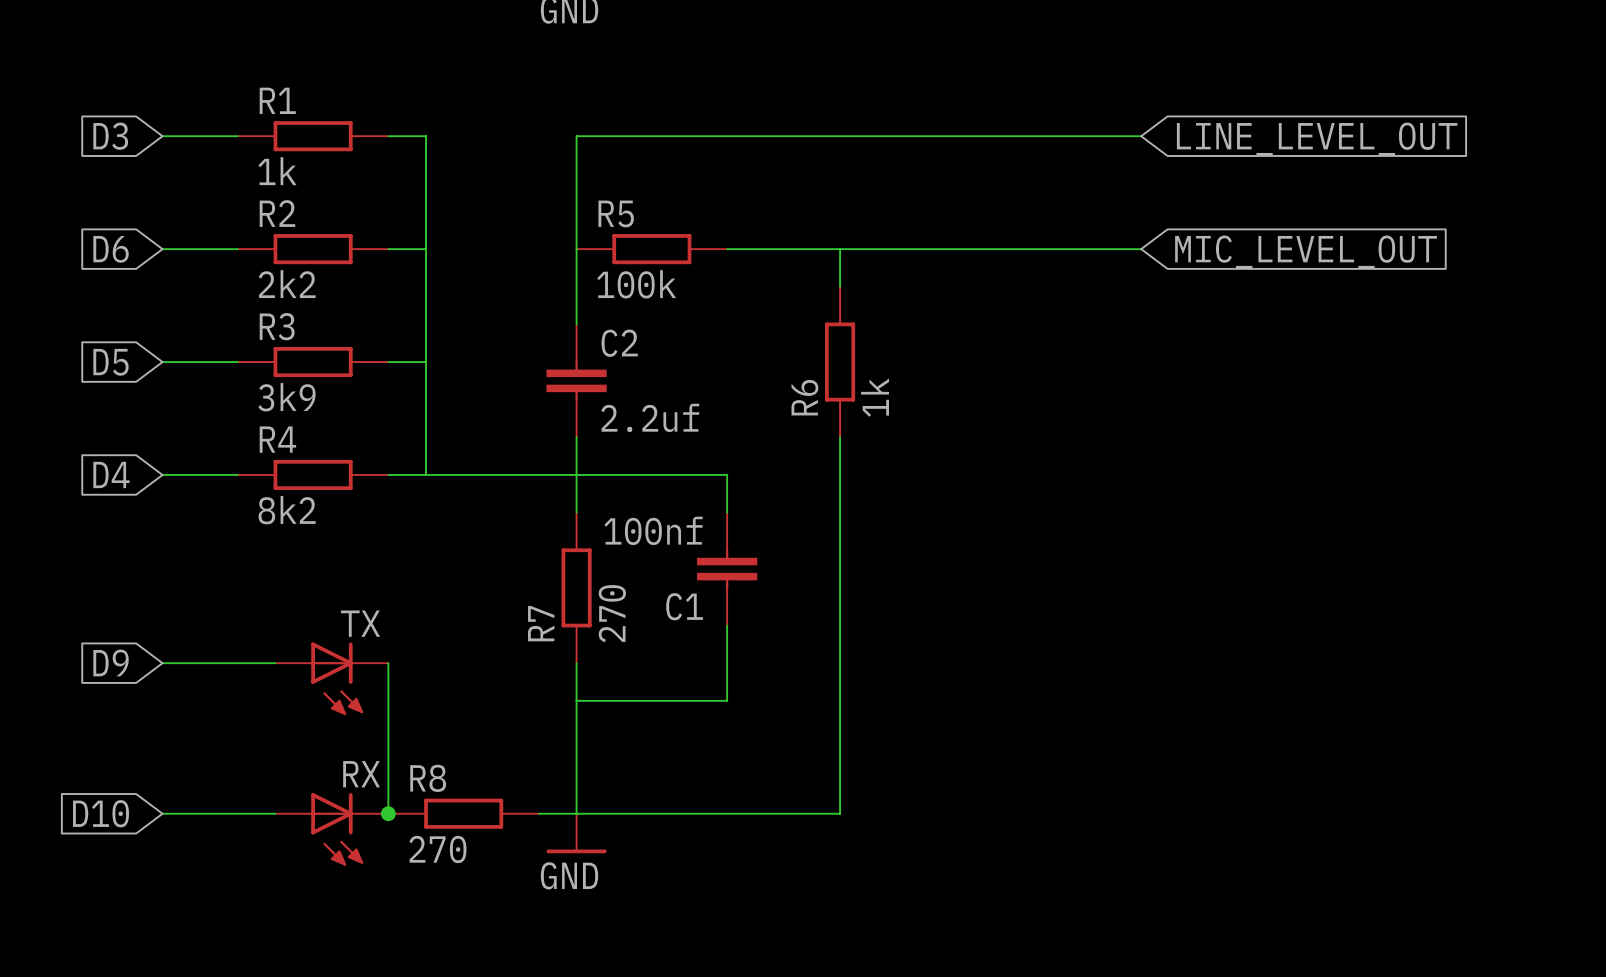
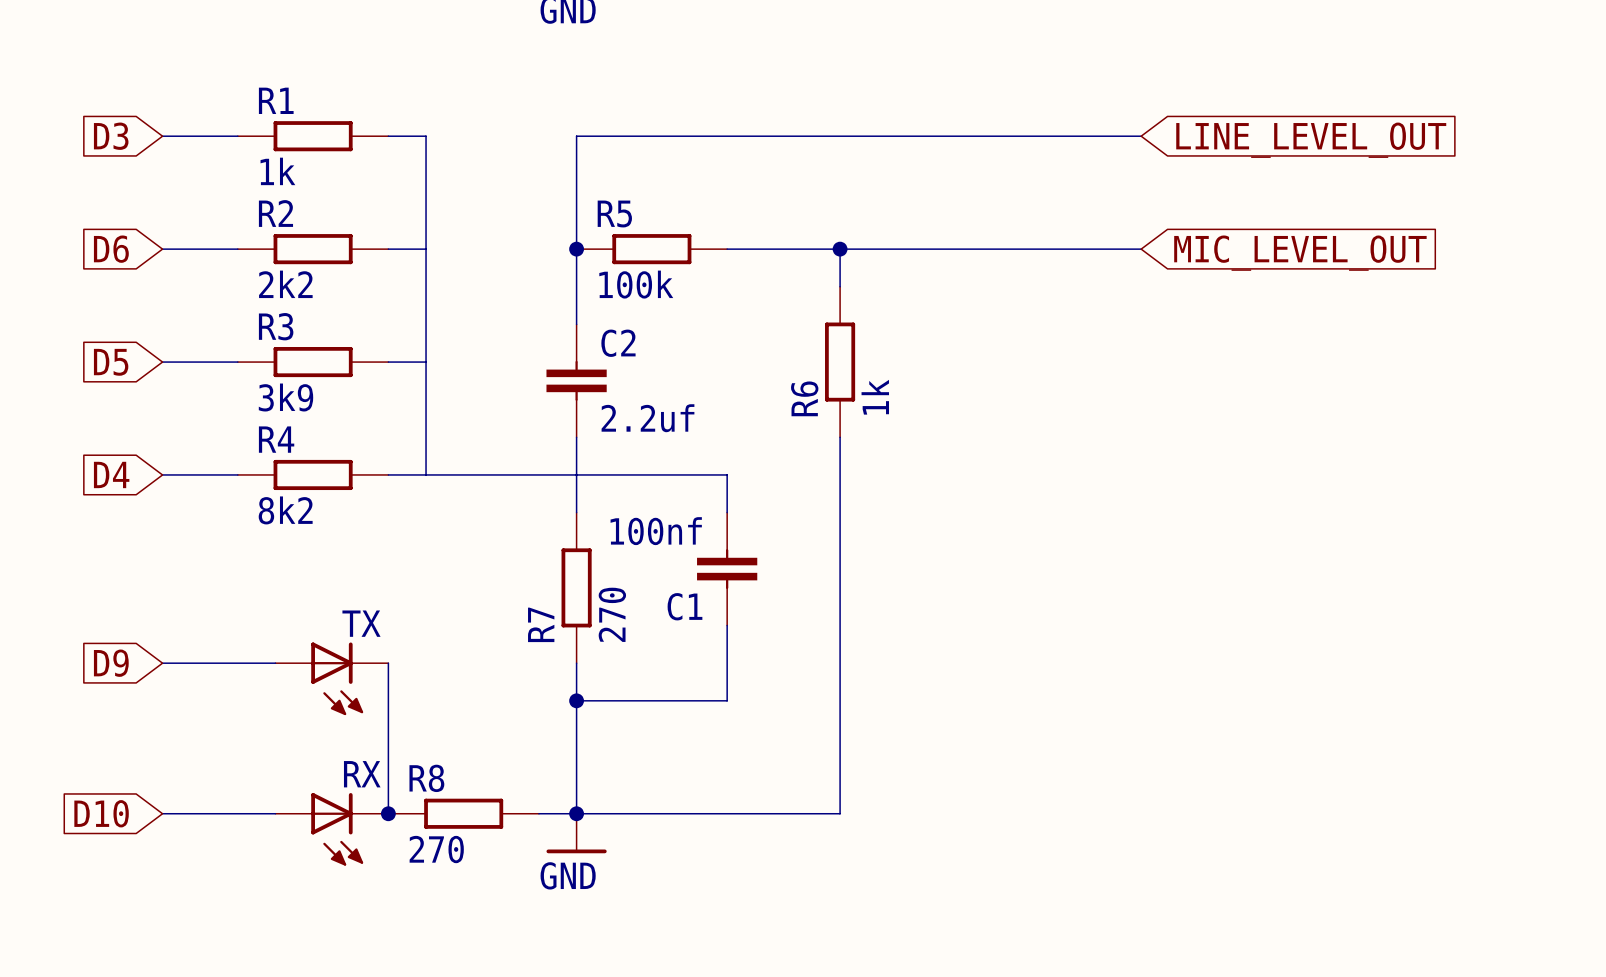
junction: none -> (576, 249)
junction: none -> (840, 249)
junction: none -> (576, 700)
junction: none -> (576, 813)

